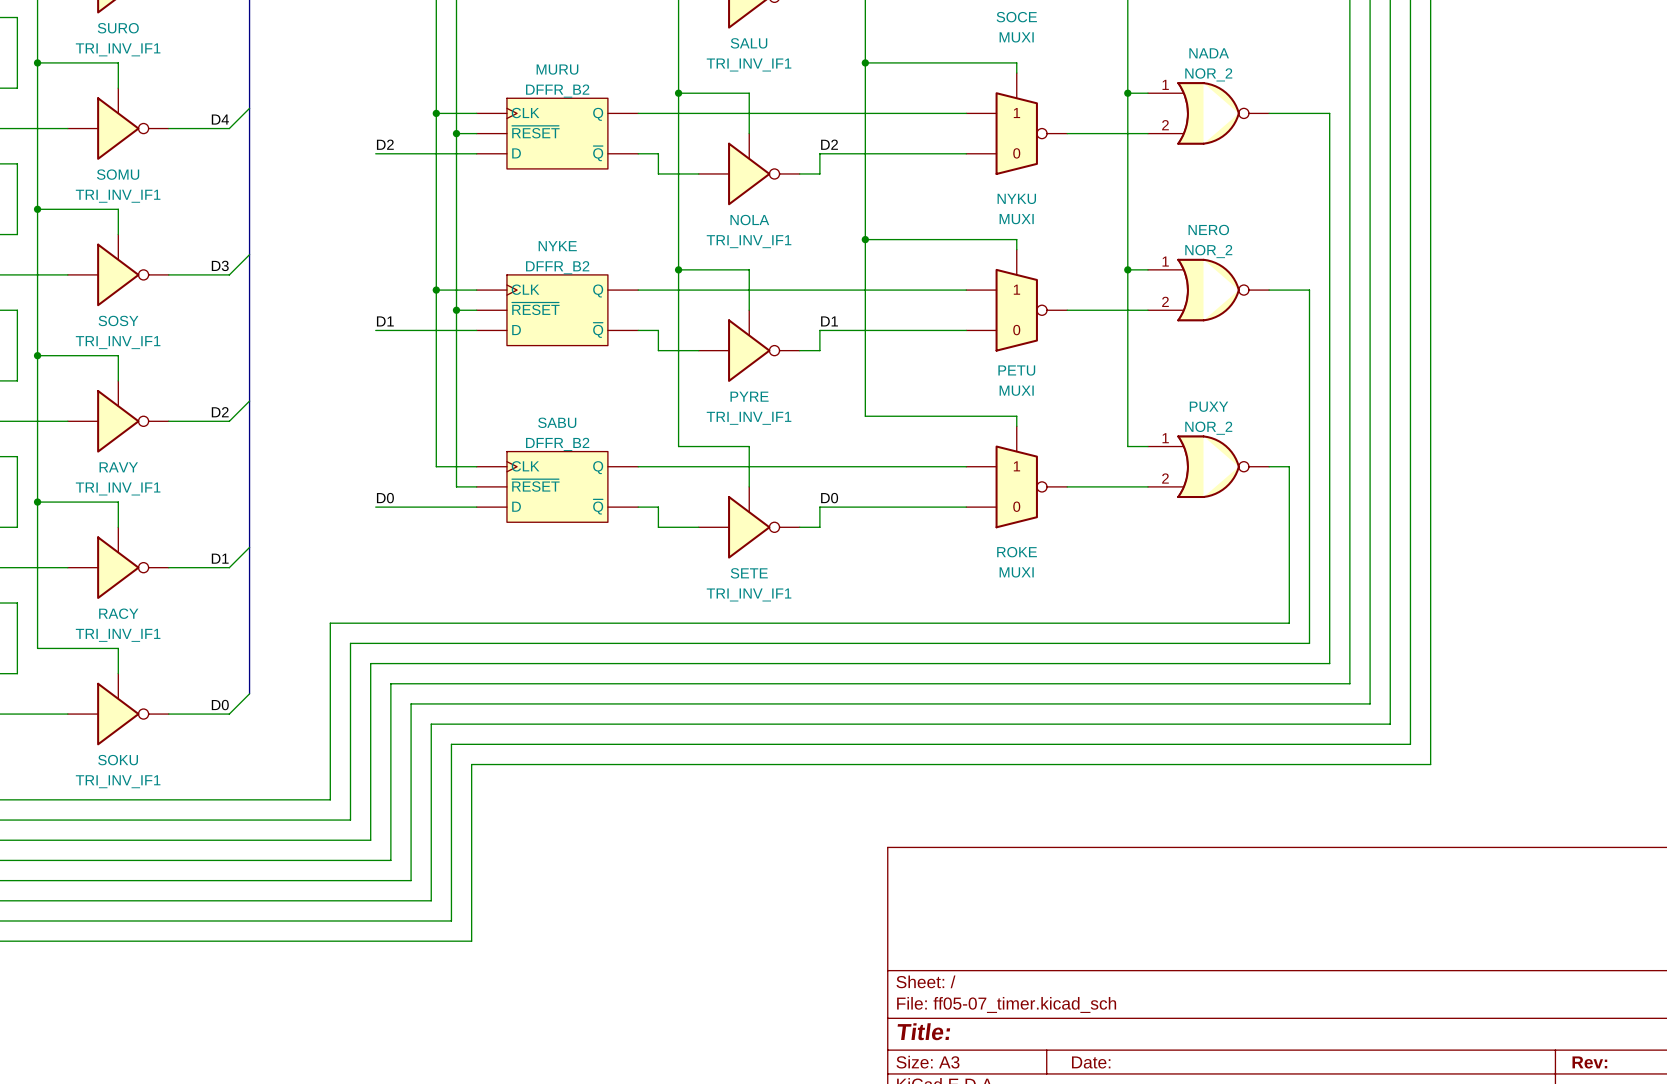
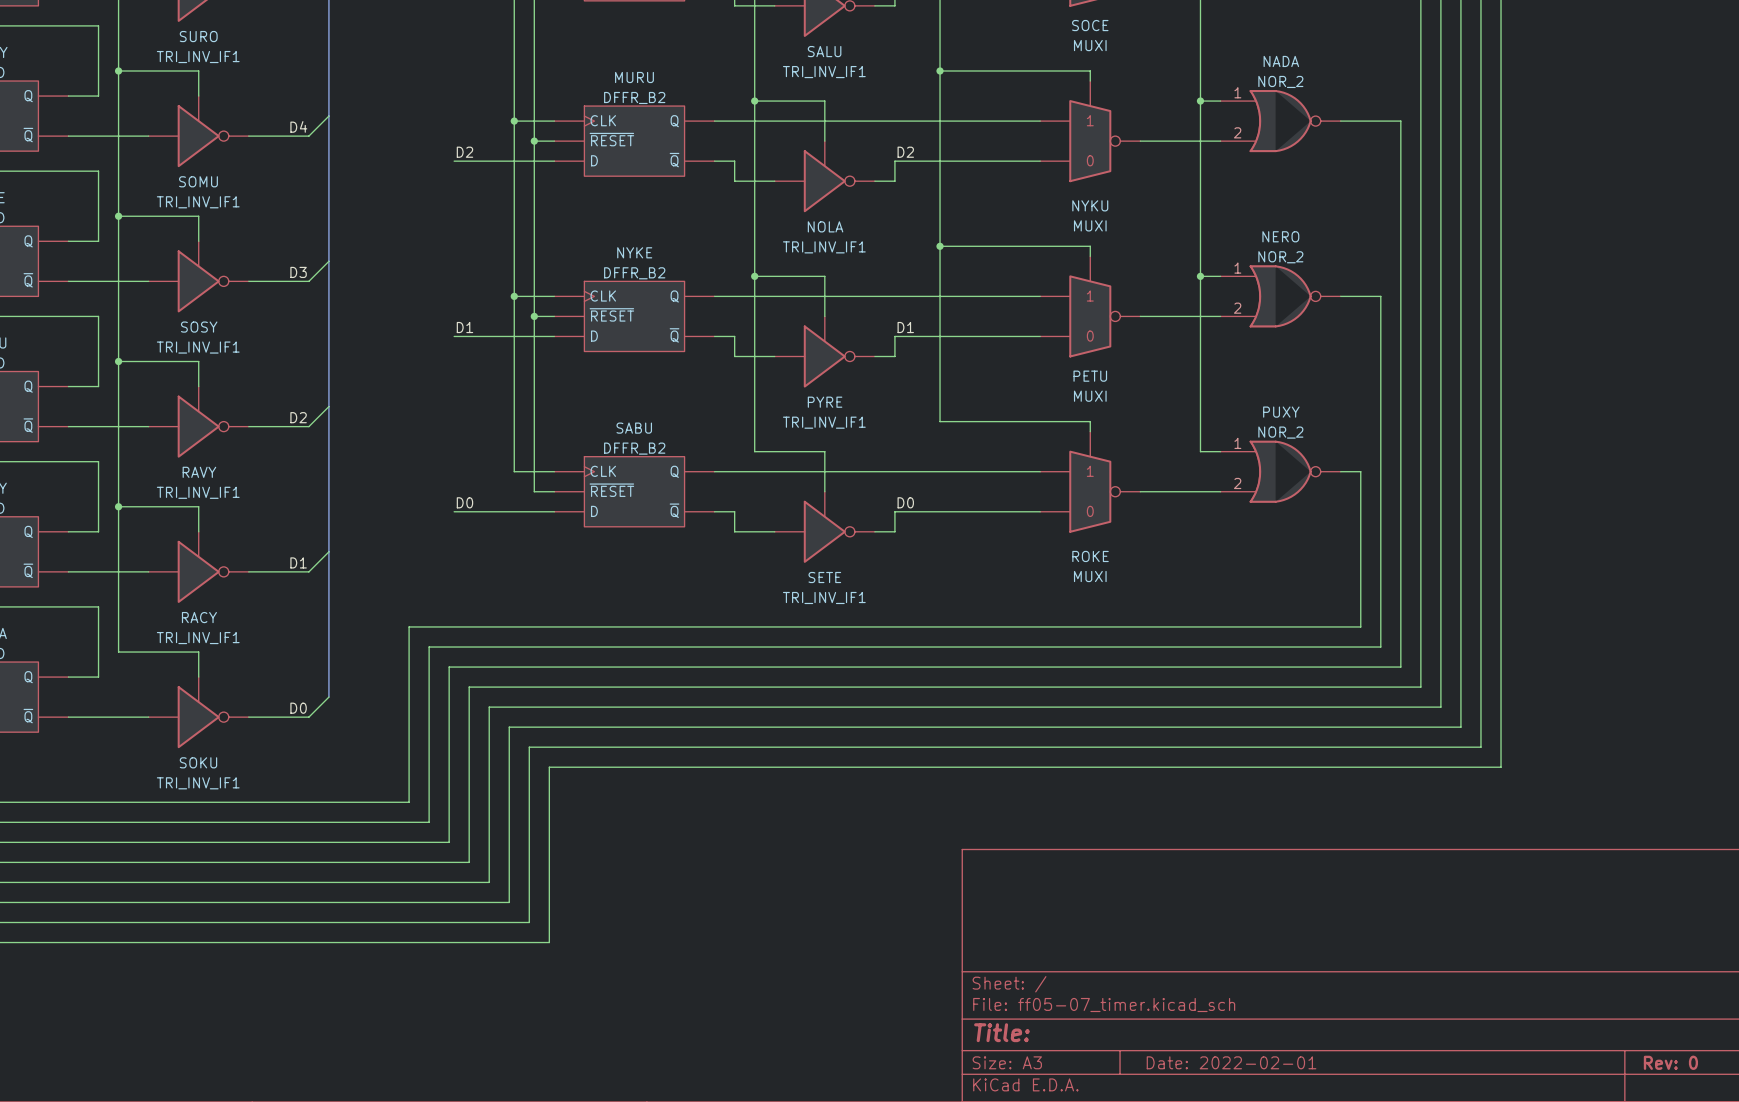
title block: Date: (1091, 1062) -> Date: 2022-02-01 (1231, 1062)
title block: Rev: (1589, 1062) -> Rev: 0 (1670, 1062)

